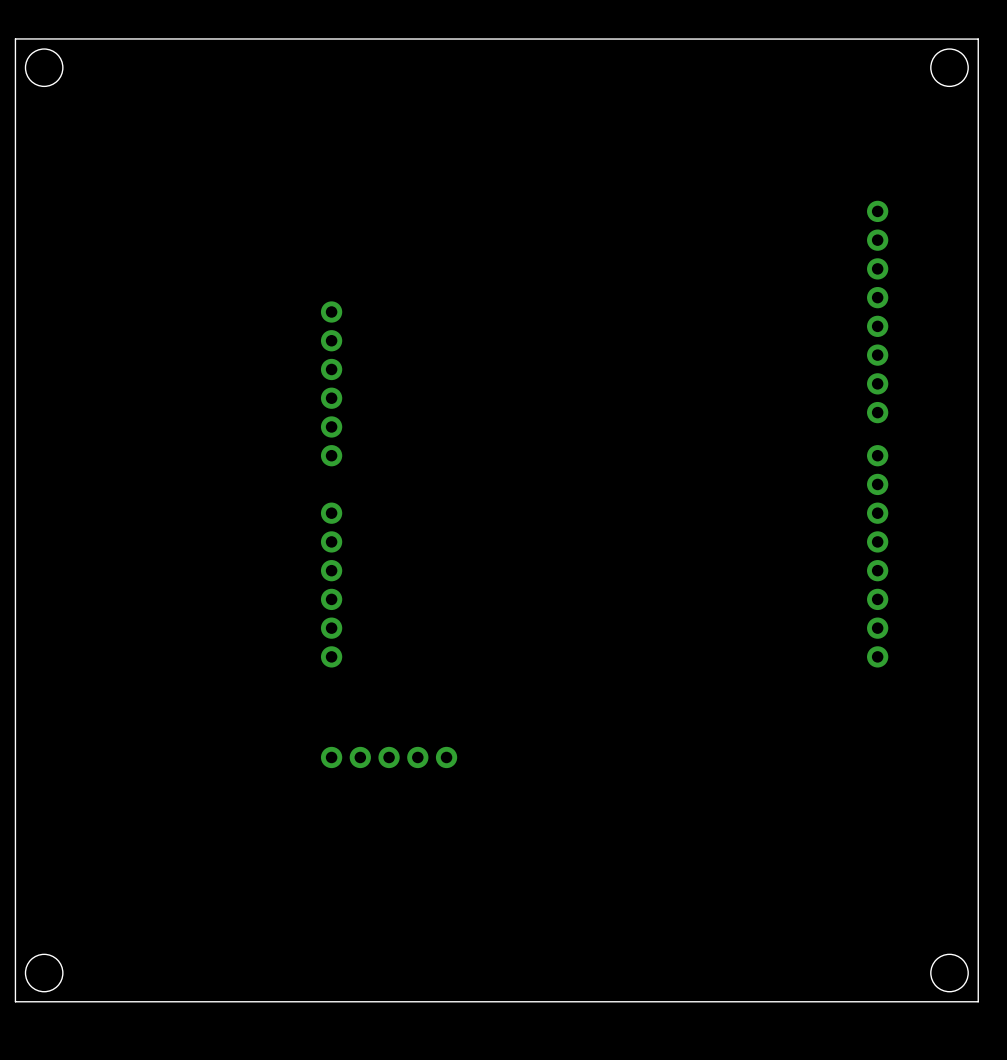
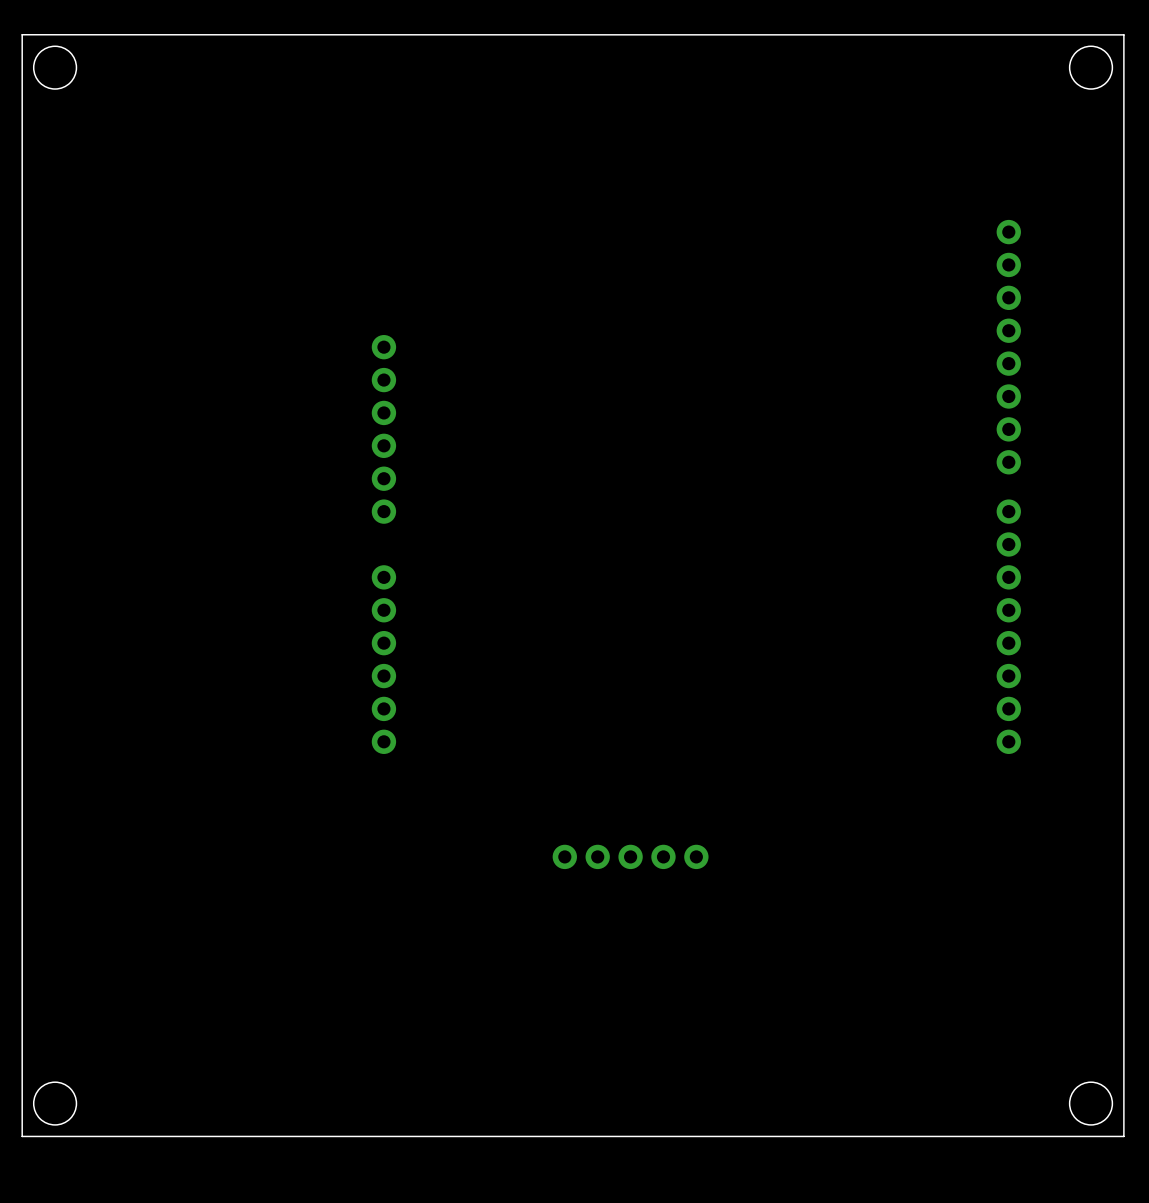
part position: (389, 757) -> (630, 856)

